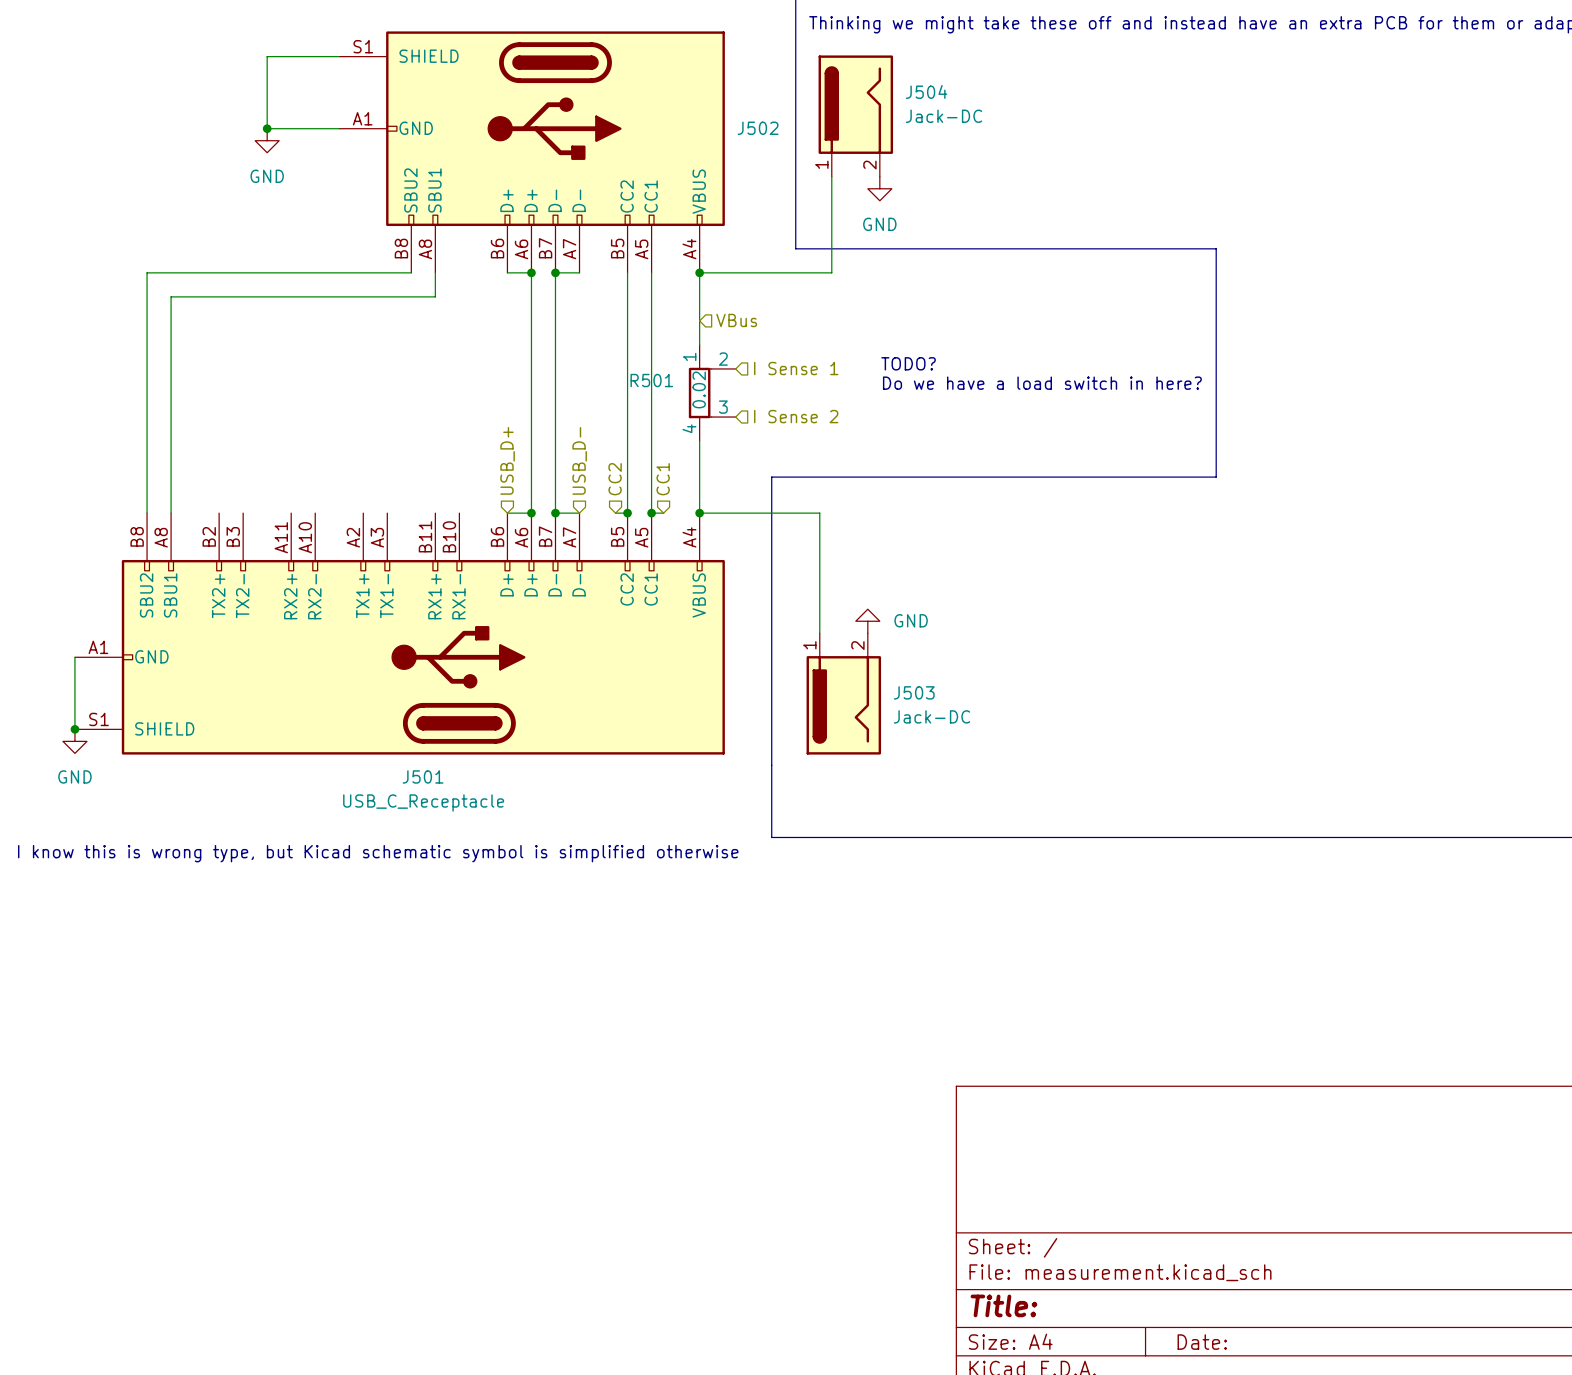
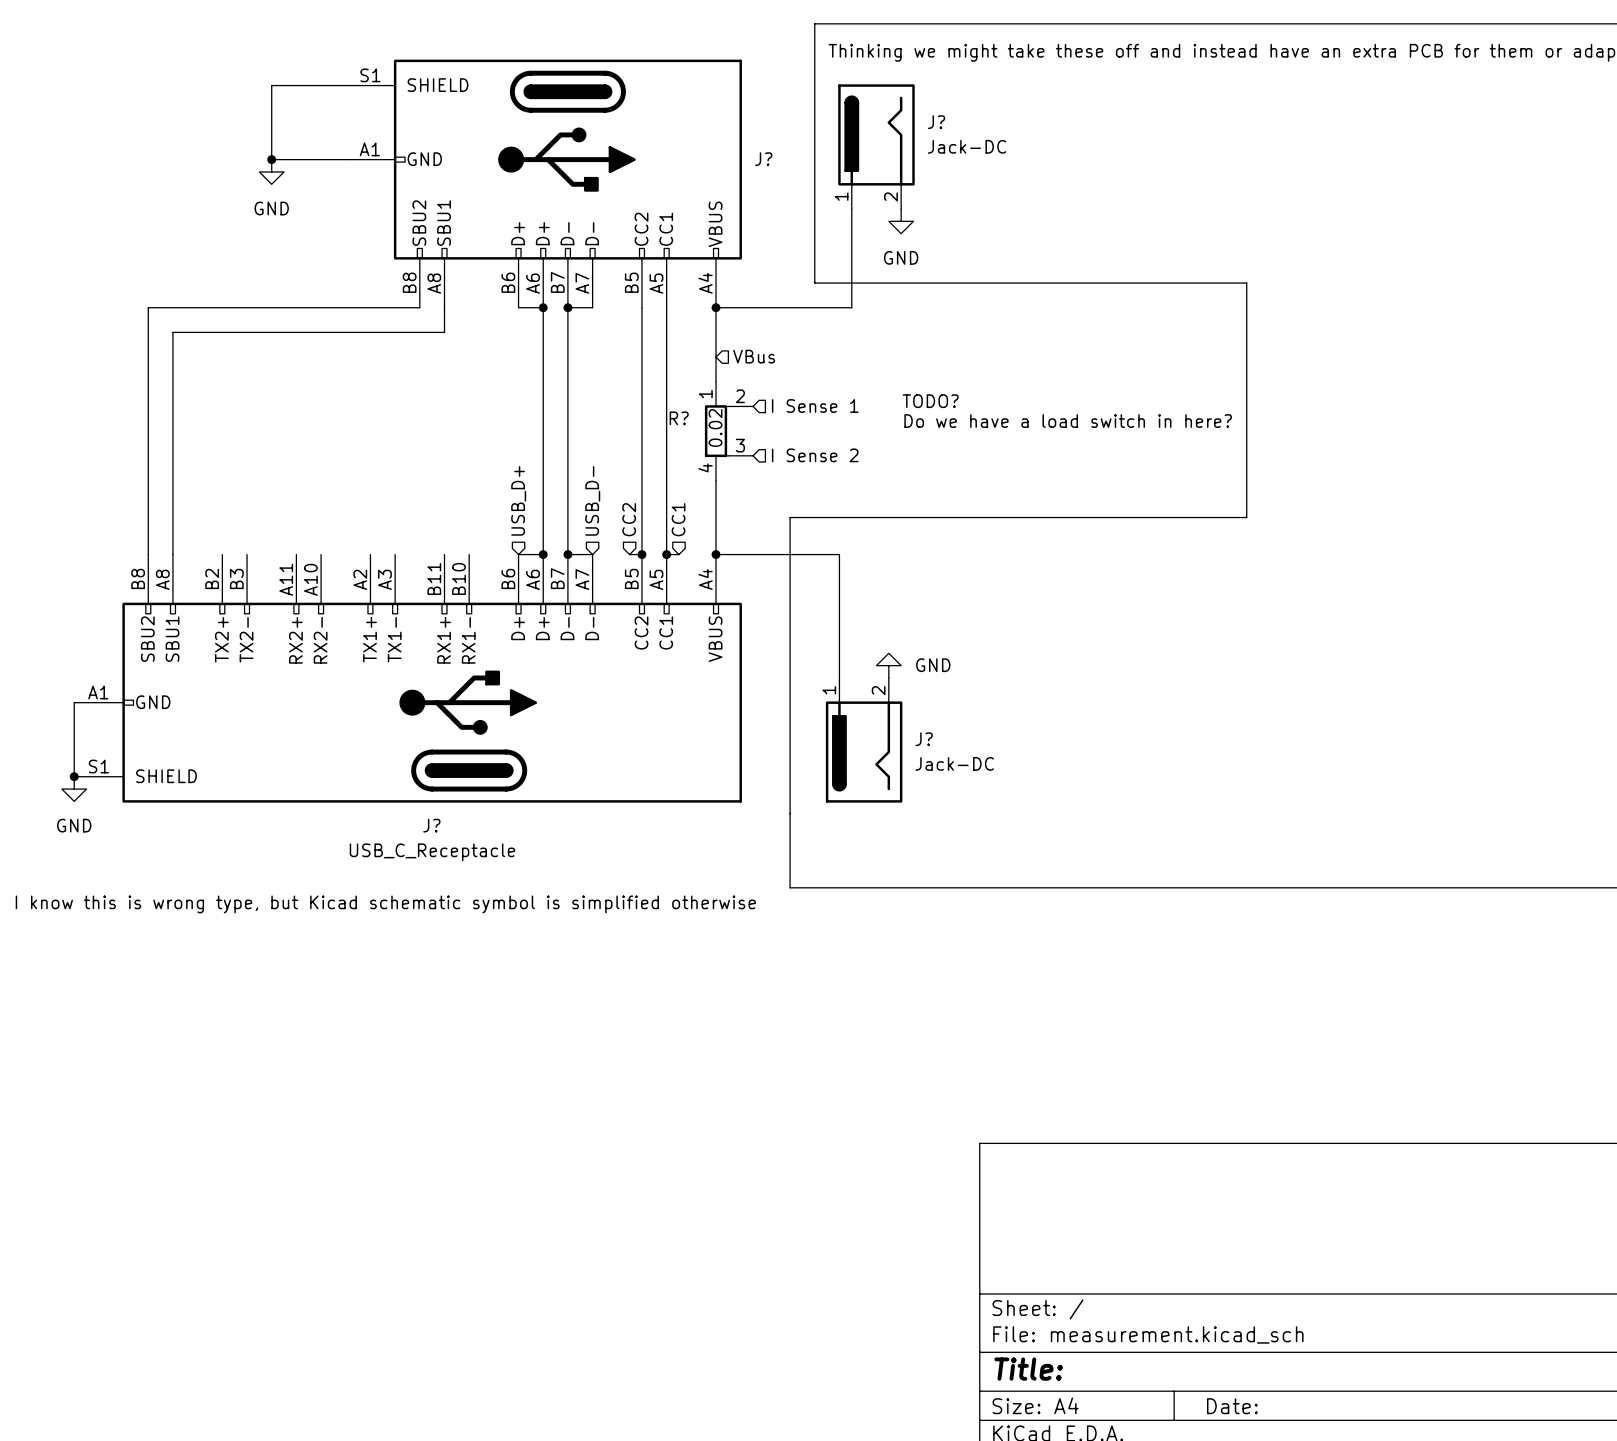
J504 name: J504 (926, 91) -> J? (936, 122)
J502 name: J502 (758, 128) -> J? (763, 159)
R501 name: R501 (651, 380) -> R? (679, 418)
J503 name: J503 (914, 692) -> J? (924, 739)
J501 name: J501 (423, 776) -> J? (431, 825)

